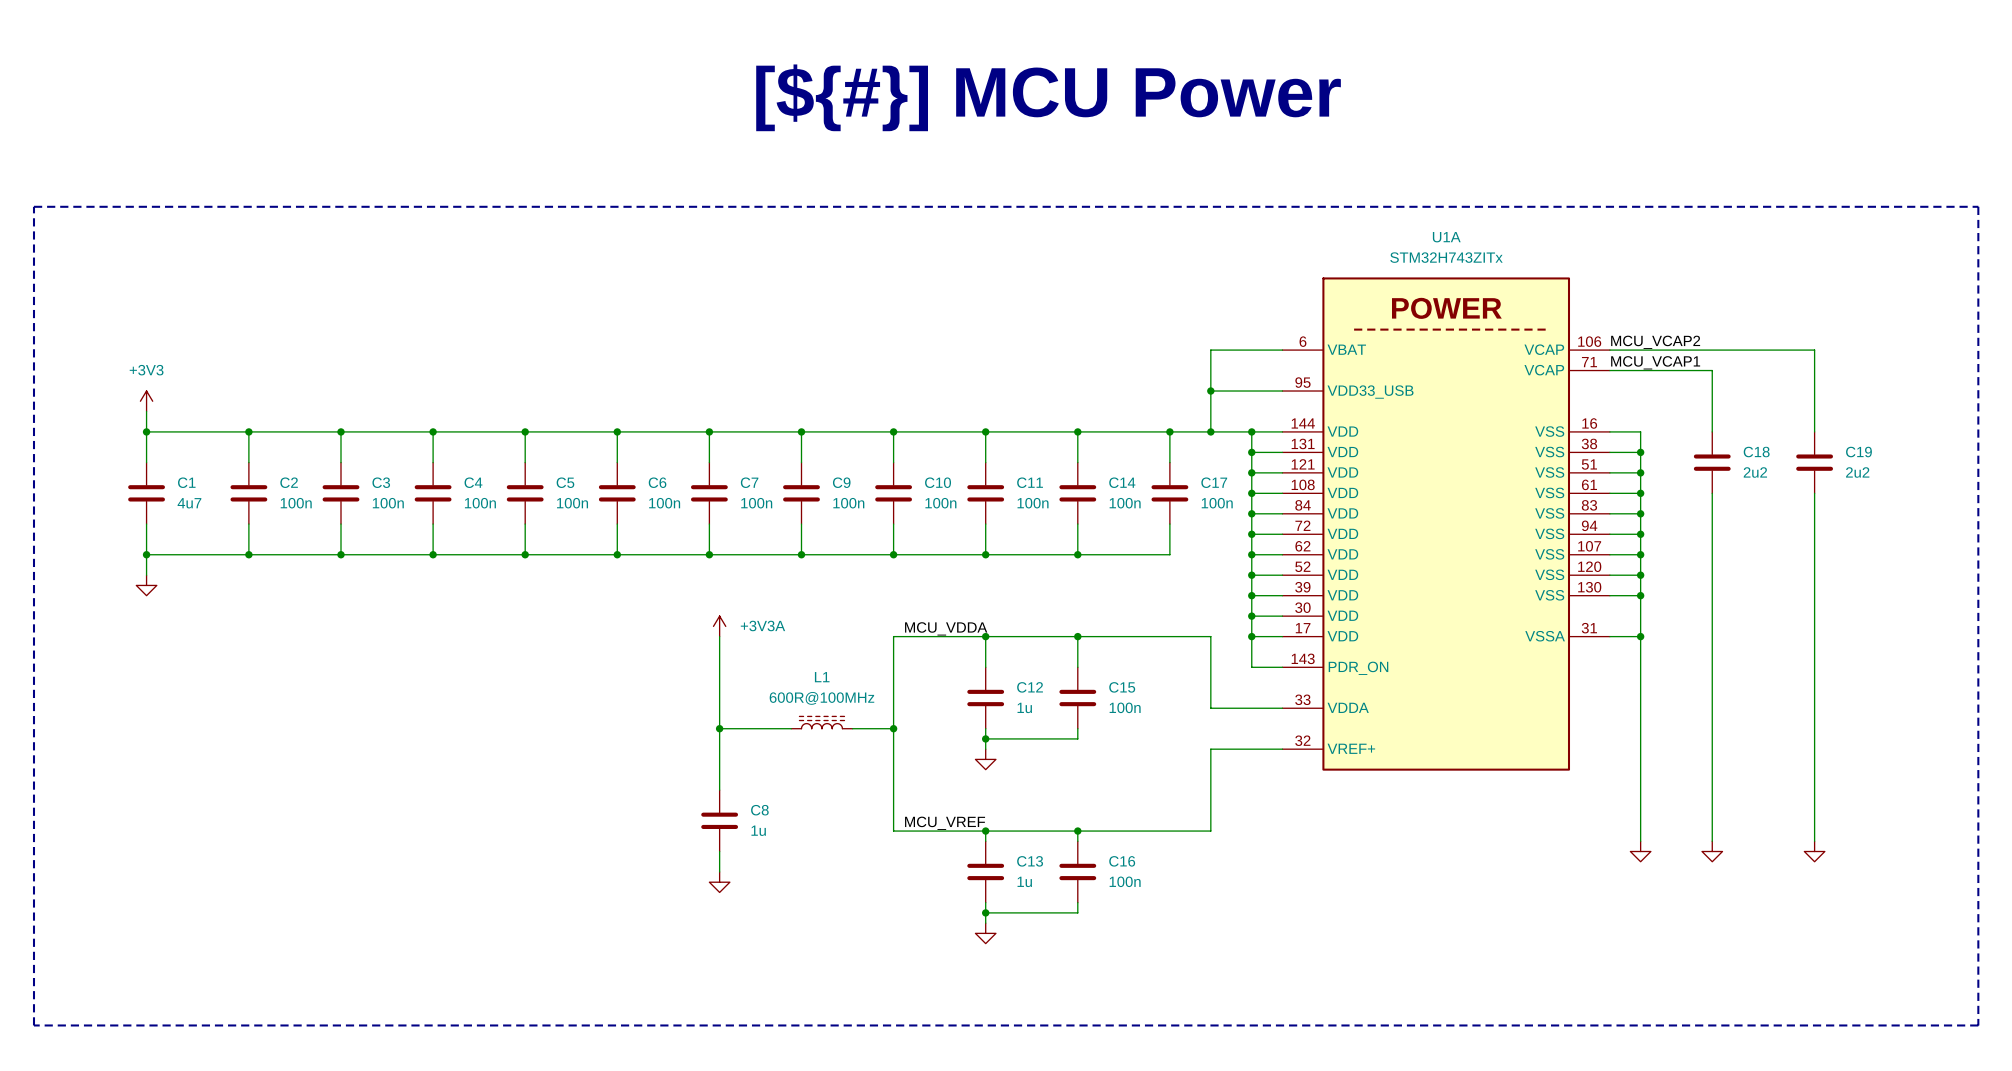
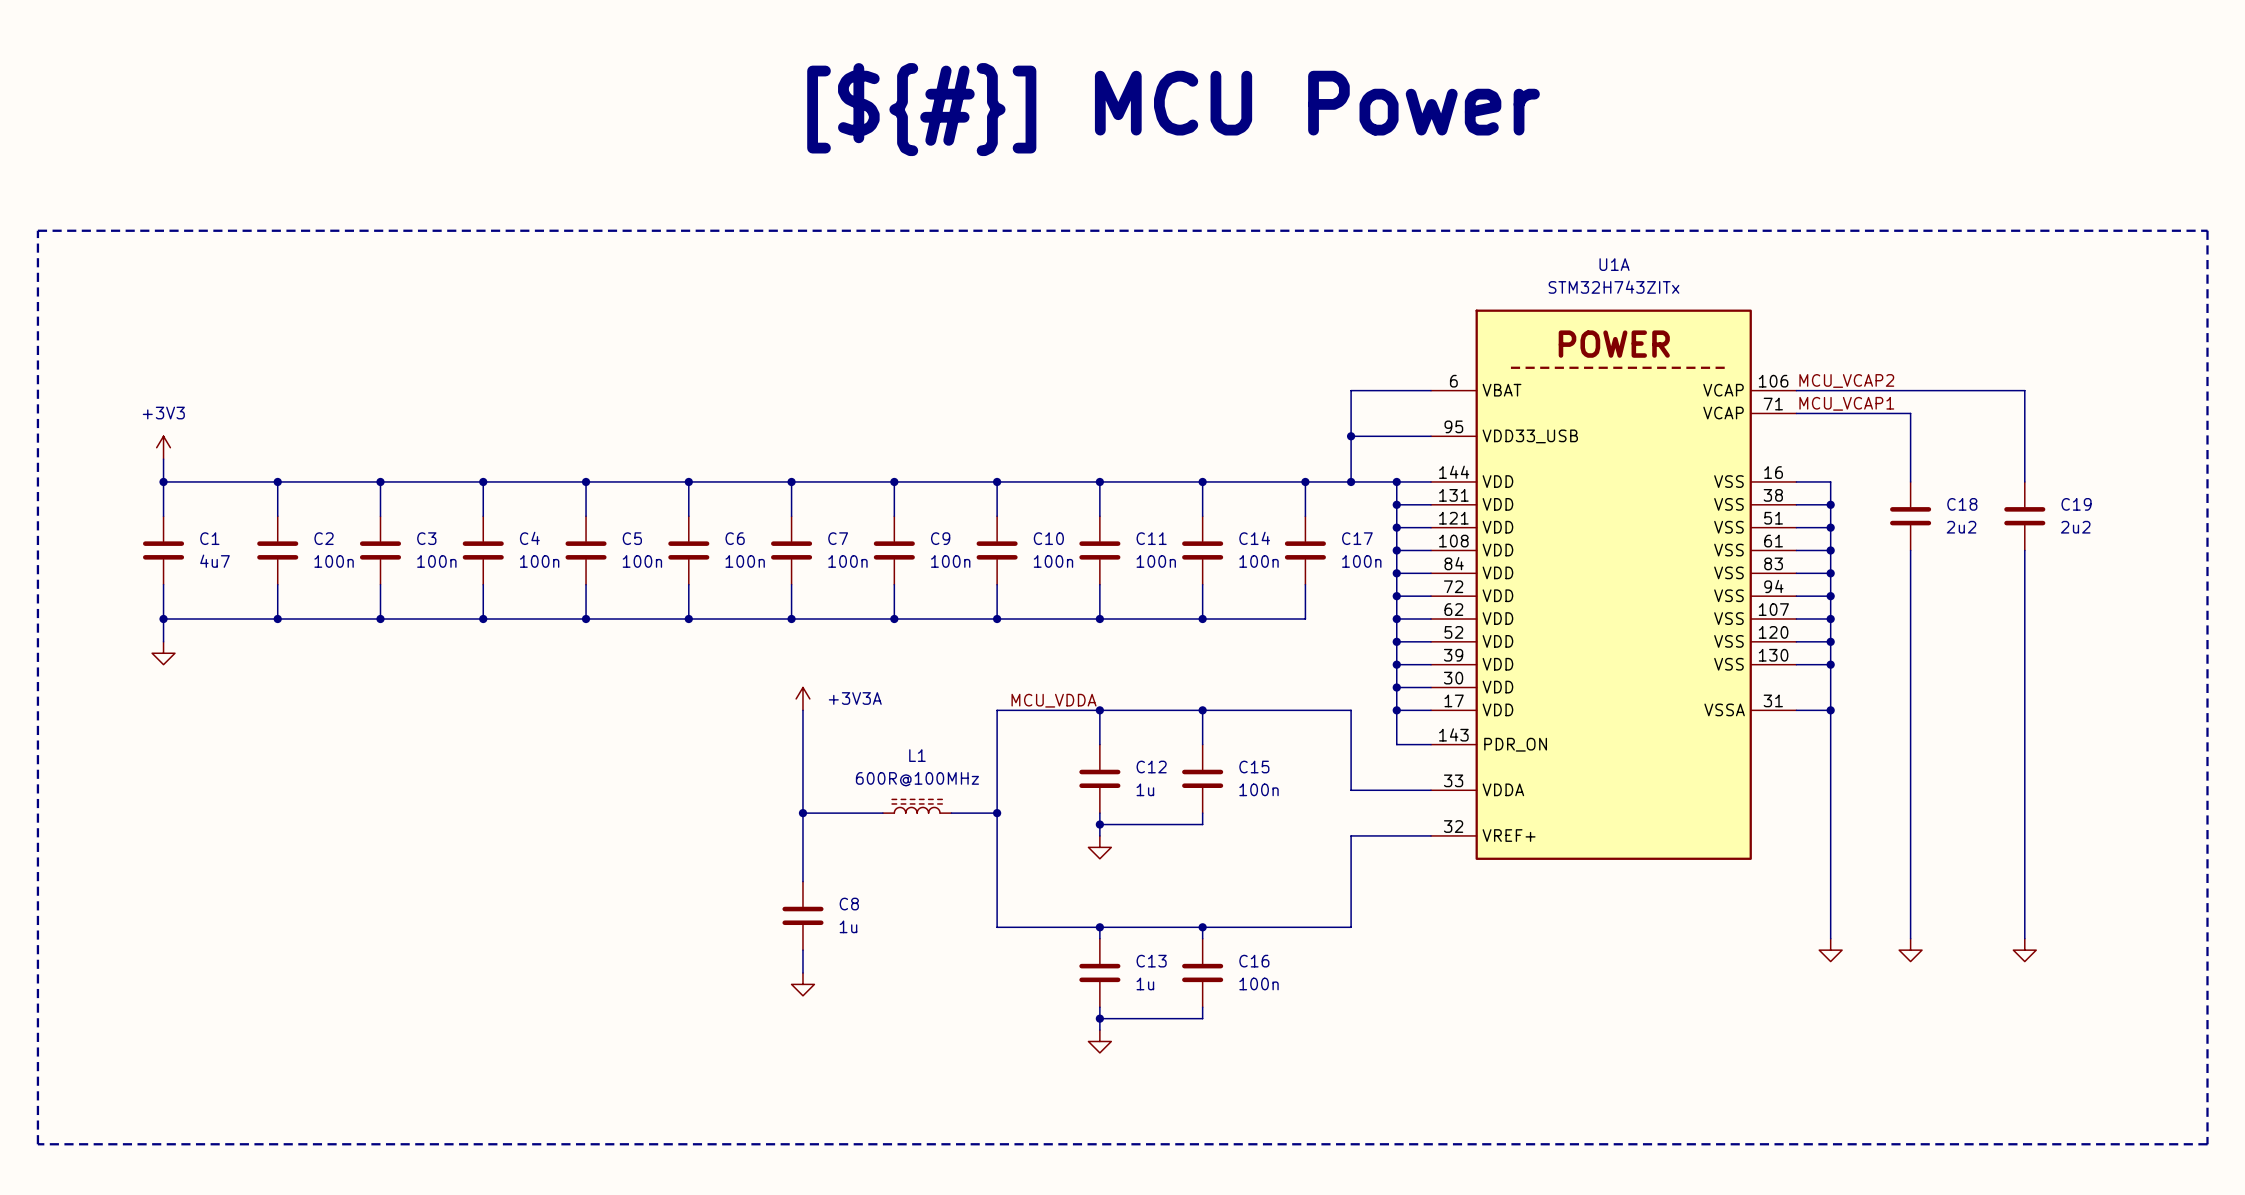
label: MCU_VREF (945, 823) -> none

